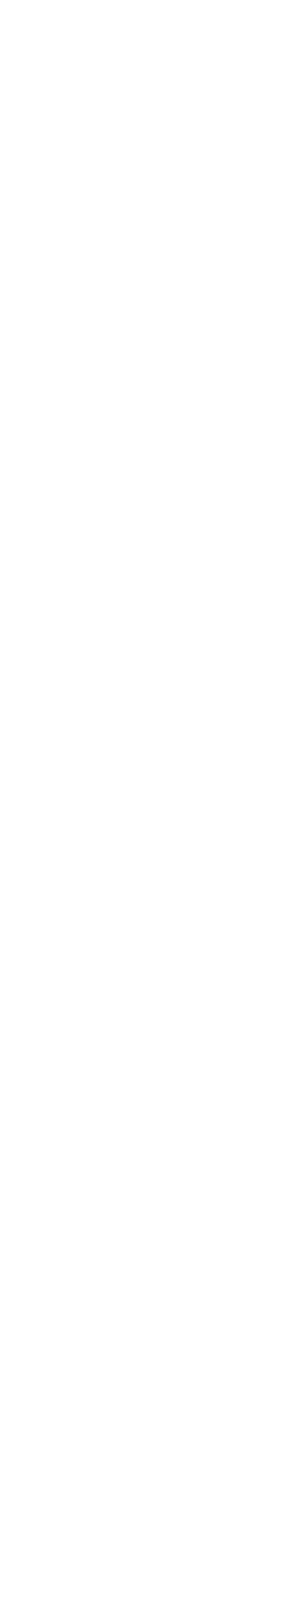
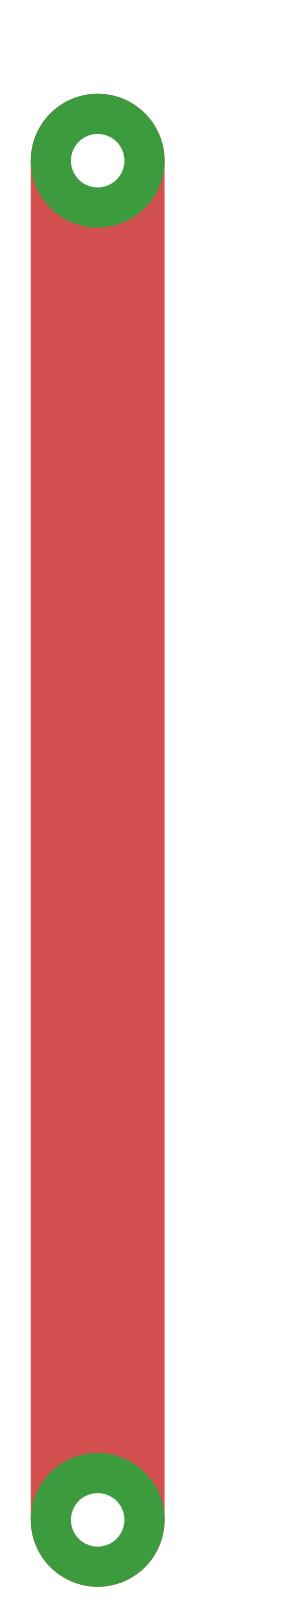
track: none -> (97, 160) (97, 1519)
via: none -> (97, 160)
via: none -> (97, 1519)

